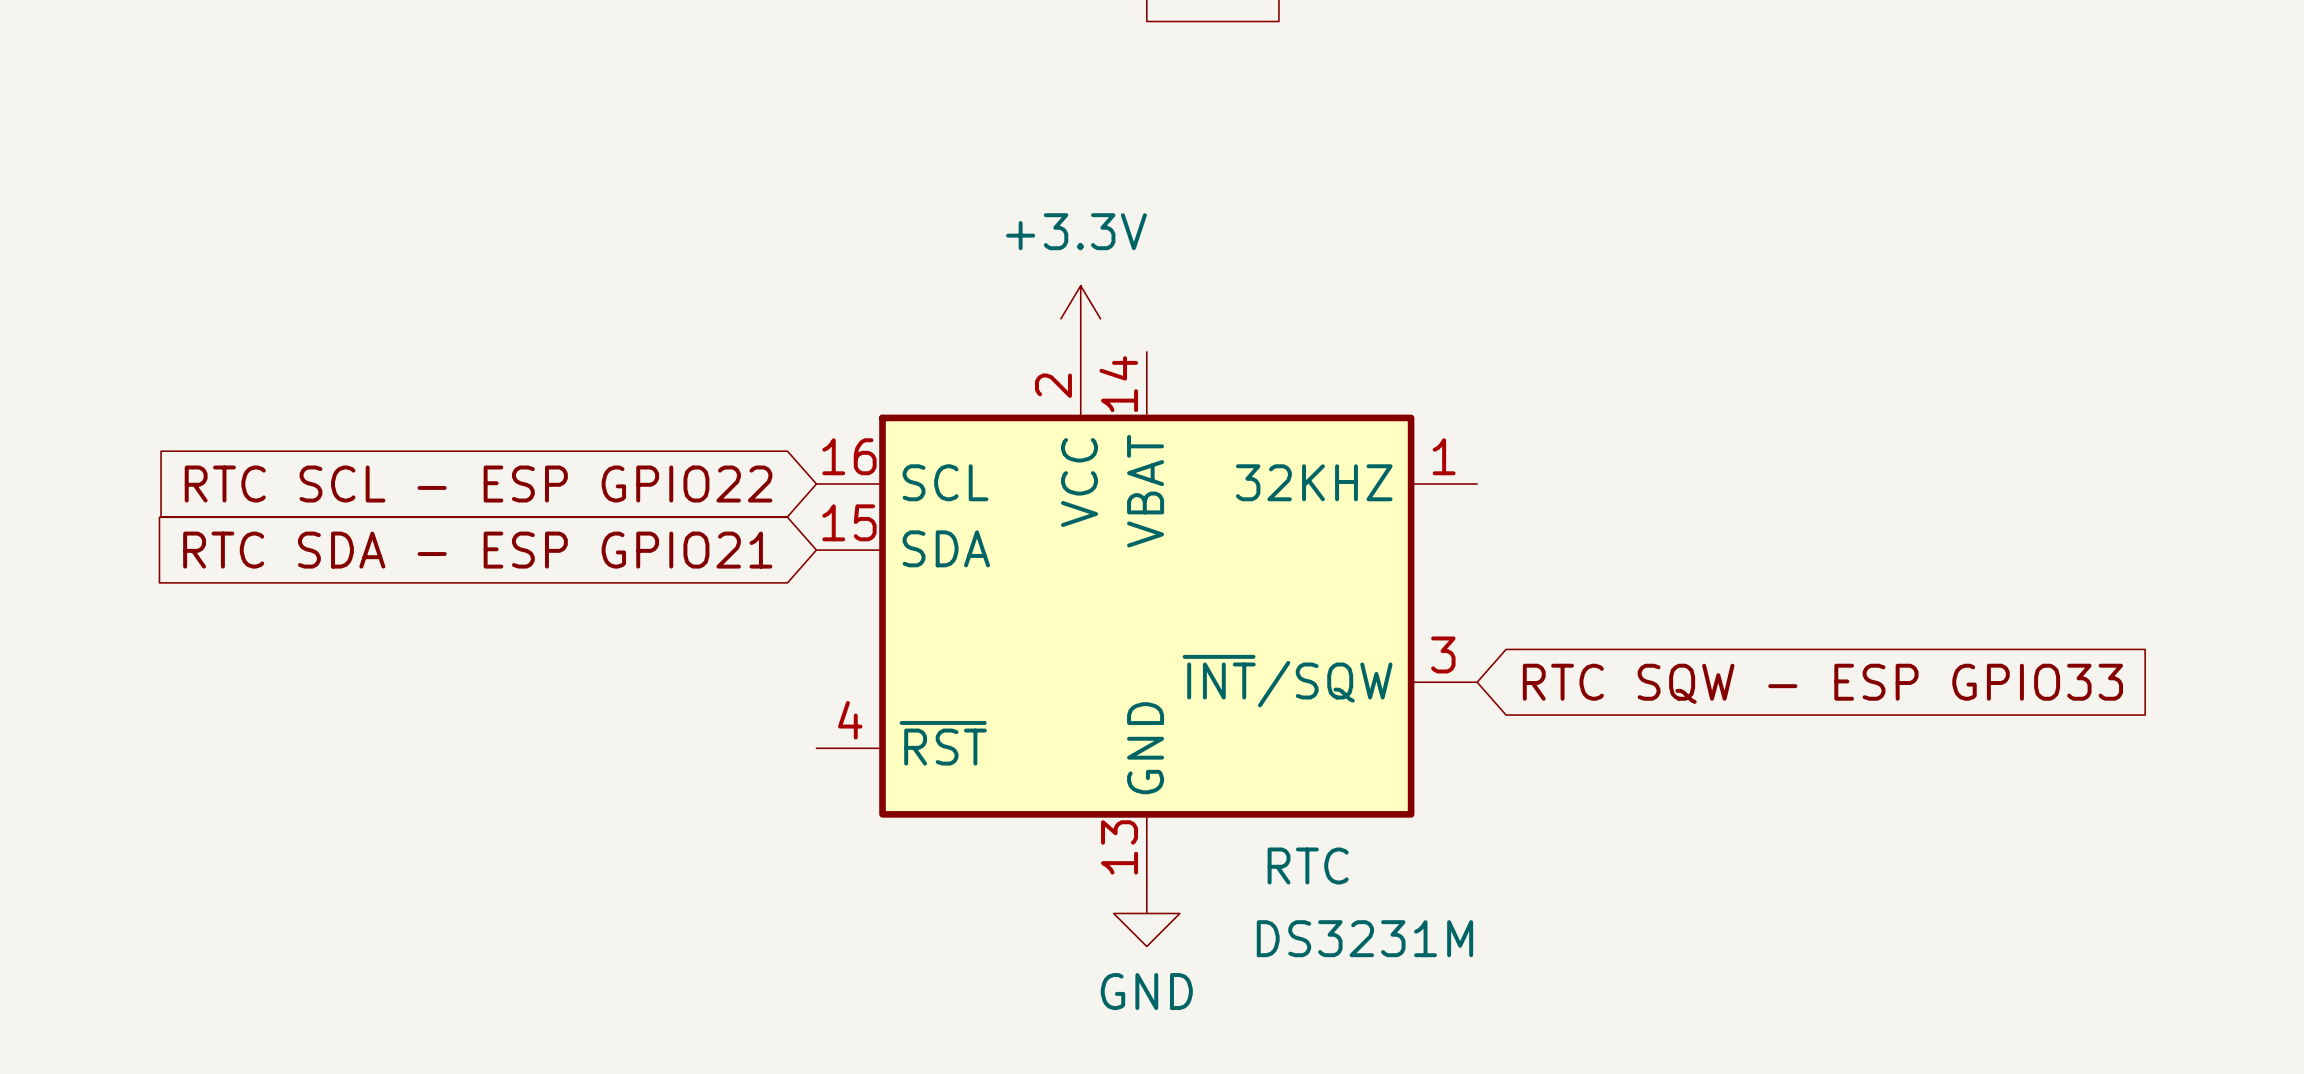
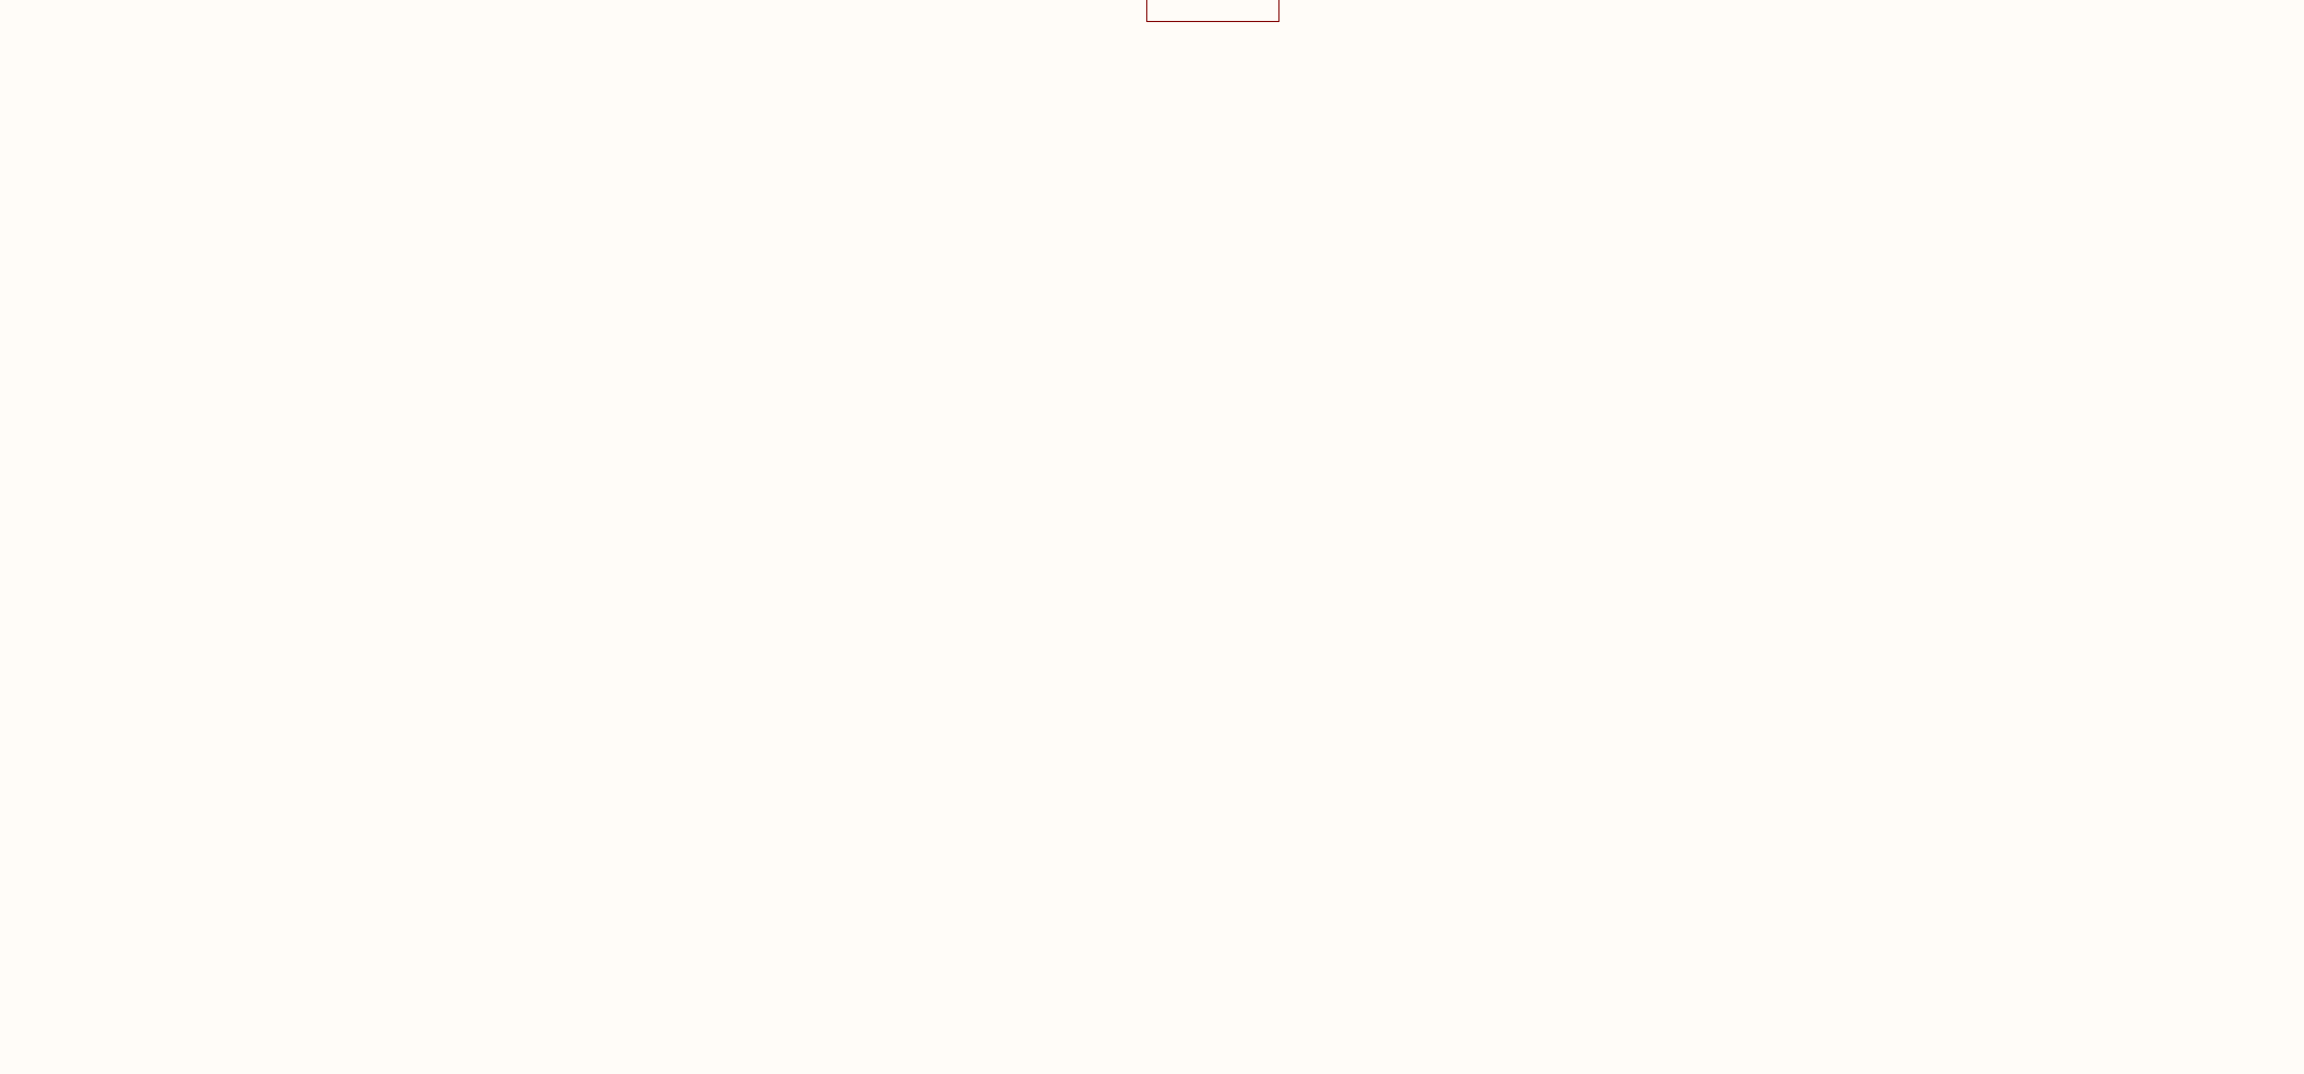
power symbol: +3.3V (1080, 318) -> none
global label: RTC SCL - ESP GPIO22 (478, 484) -> none
global label: RTC SDA - ESP GPIO21 (477, 550) -> none
RTC: DS3231M (1146, 616) -> none
global label: RTC SQW - ESP GPIO33 (1822, 683) -> none
power symbol: GND (1146, 913) -> none

